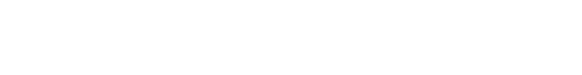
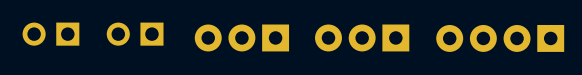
part: none -> (50, 34)
part: none -> (135, 34)
part: none -> (241, 37)
part: none -> (362, 37)
part: none -> (500, 38)

